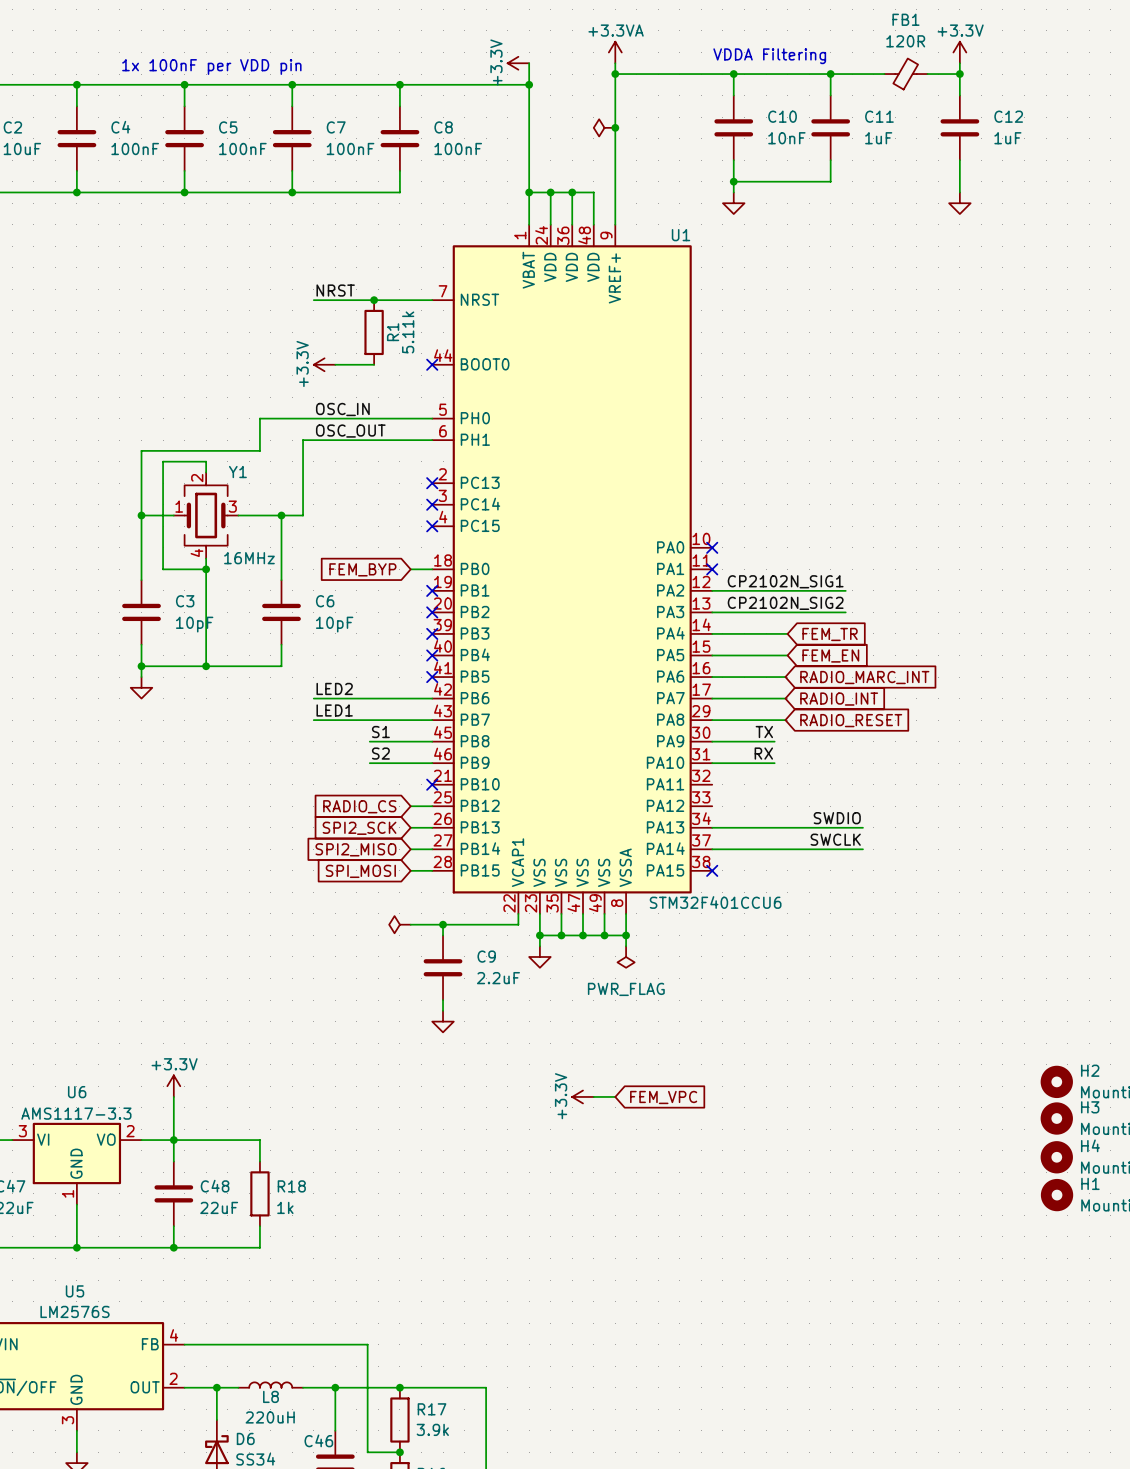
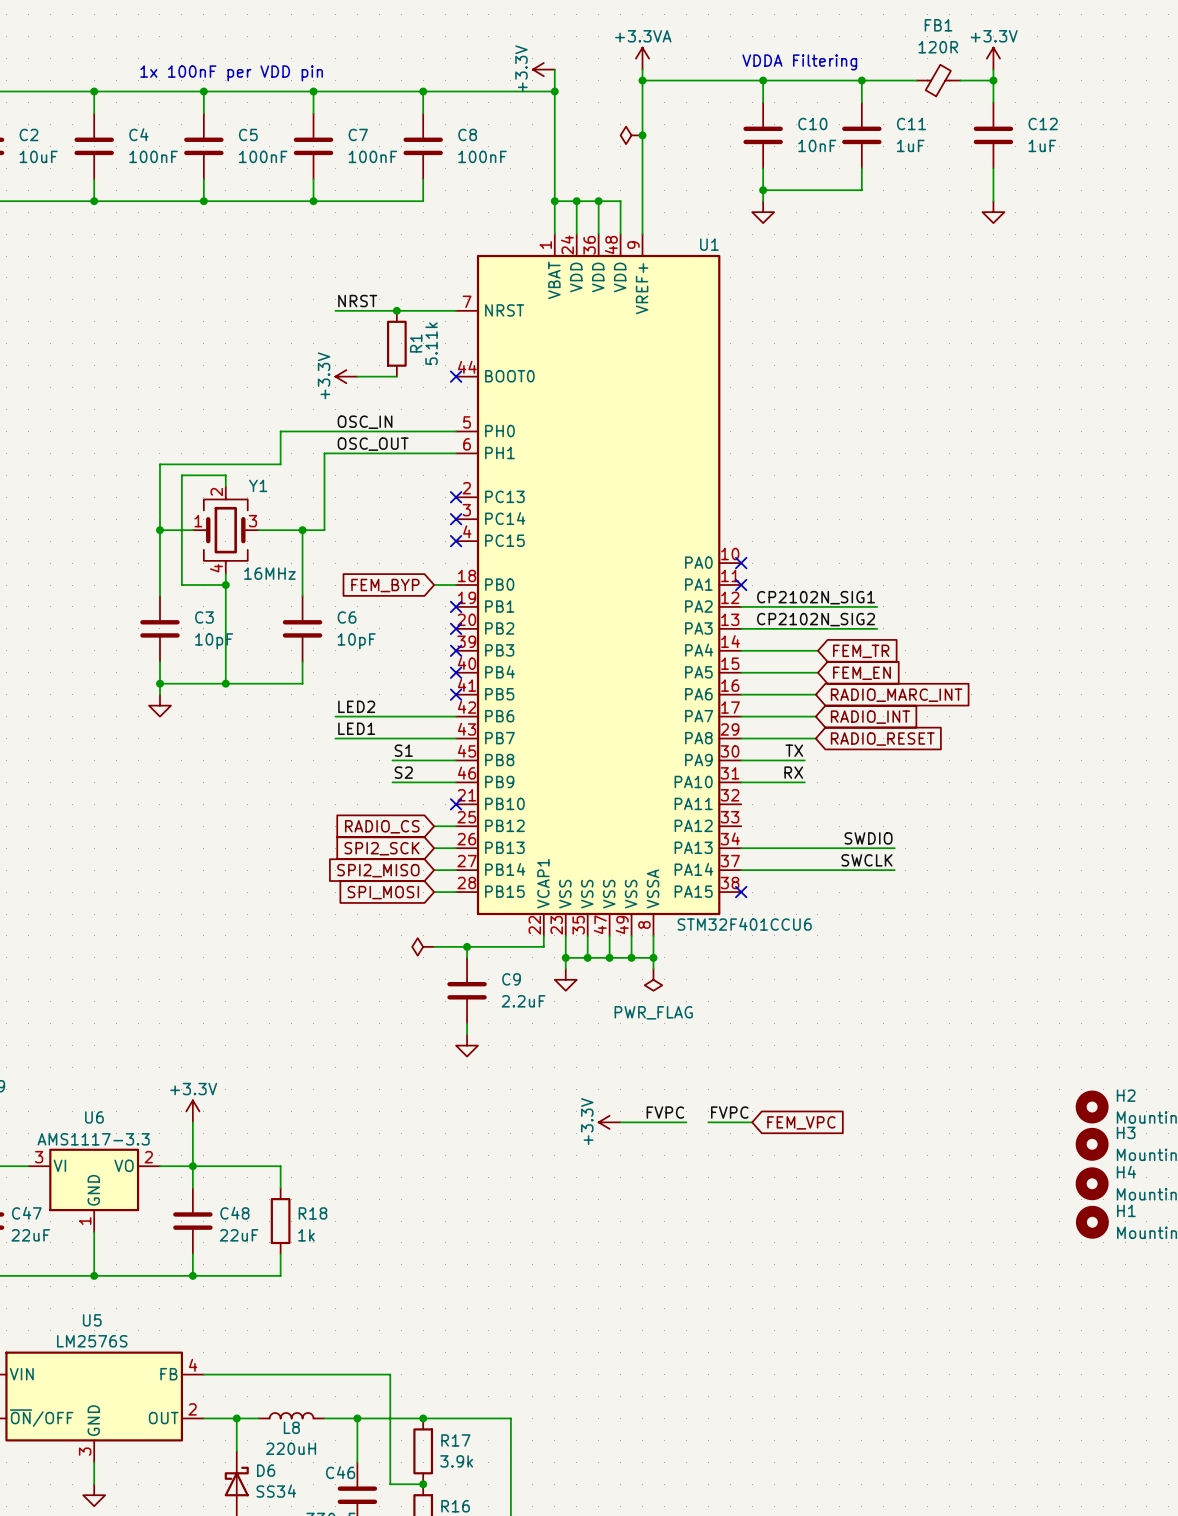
label: none -> FVPC (665, 1112)
label: none -> FVPC (729, 1112)
wire: none -> (642, 1122) (686, 1122)
wire: none -> (708, 1122) (752, 1122)
global label position: FEM_VPC (663, 1097) -> FEM_VPC (801, 1122)

